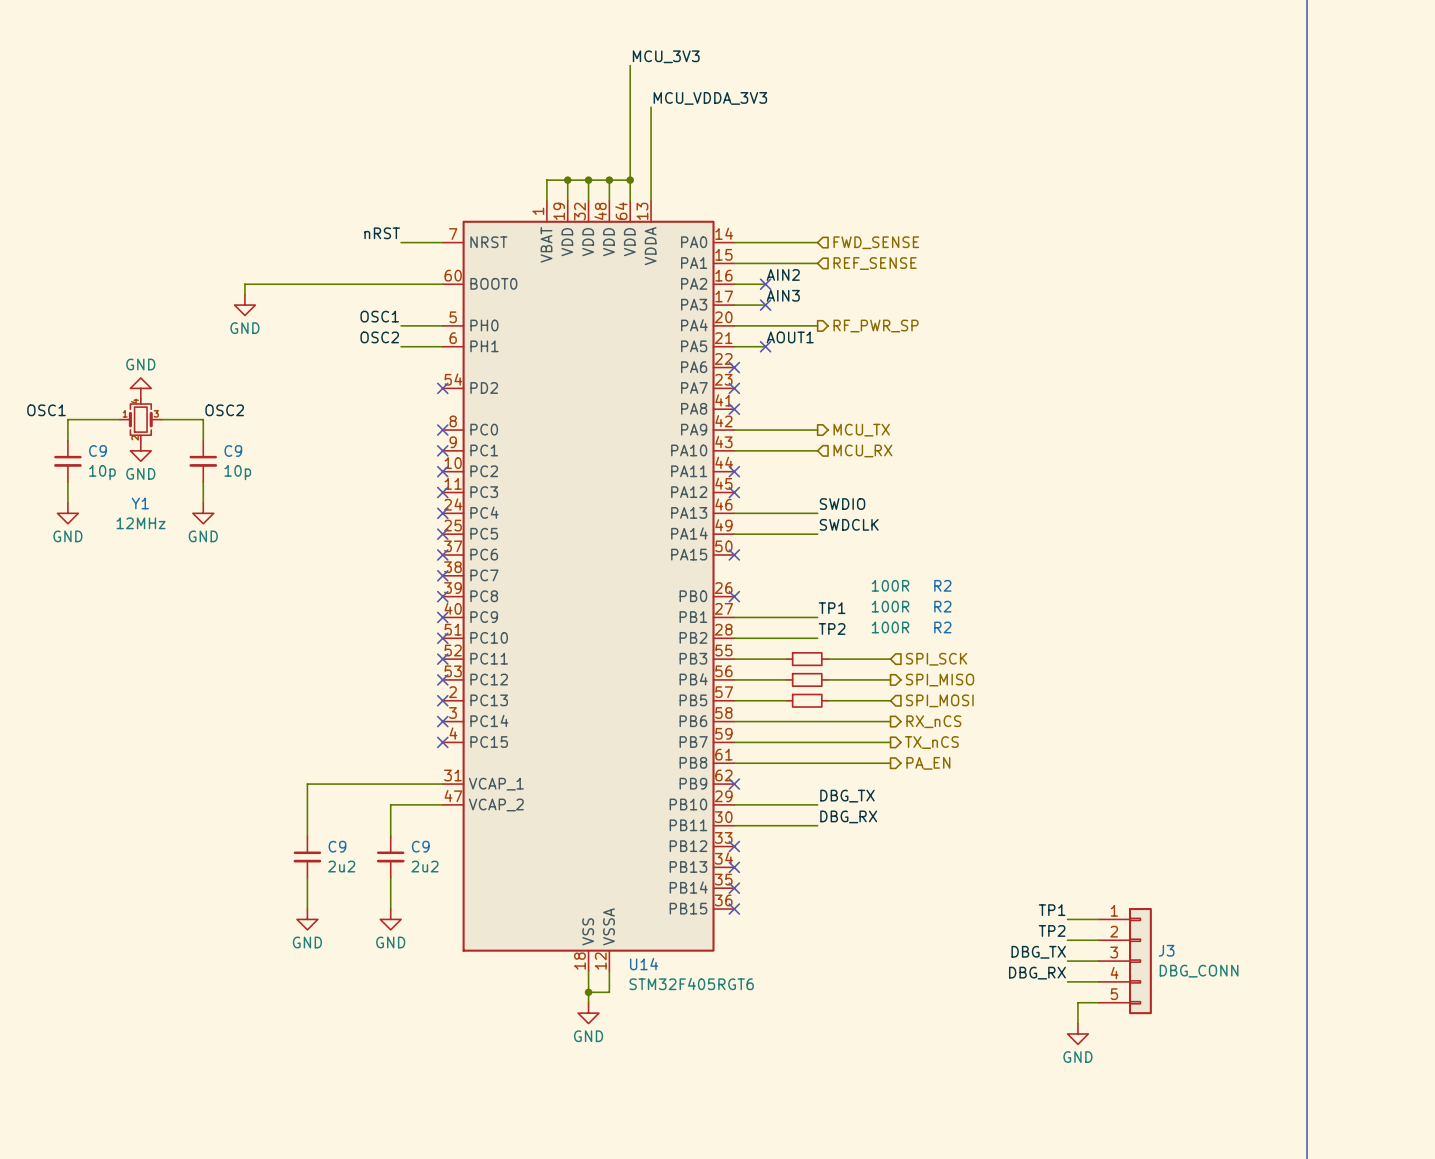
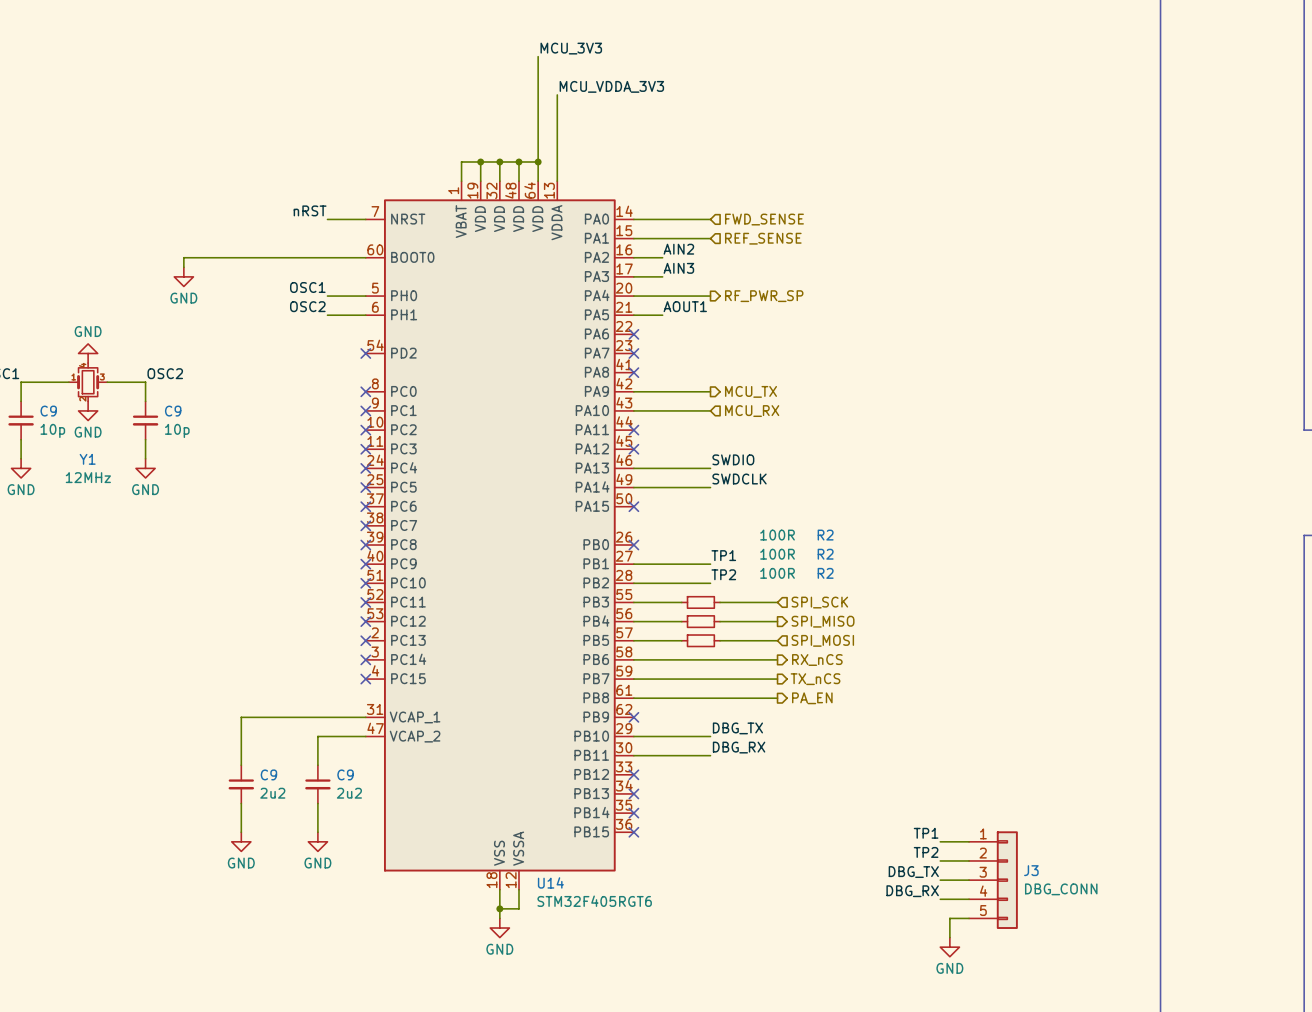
no-connect mark: (765, 284) -> none
no-connect mark: (765, 305) -> none
no-connect mark: (765, 346) -> none

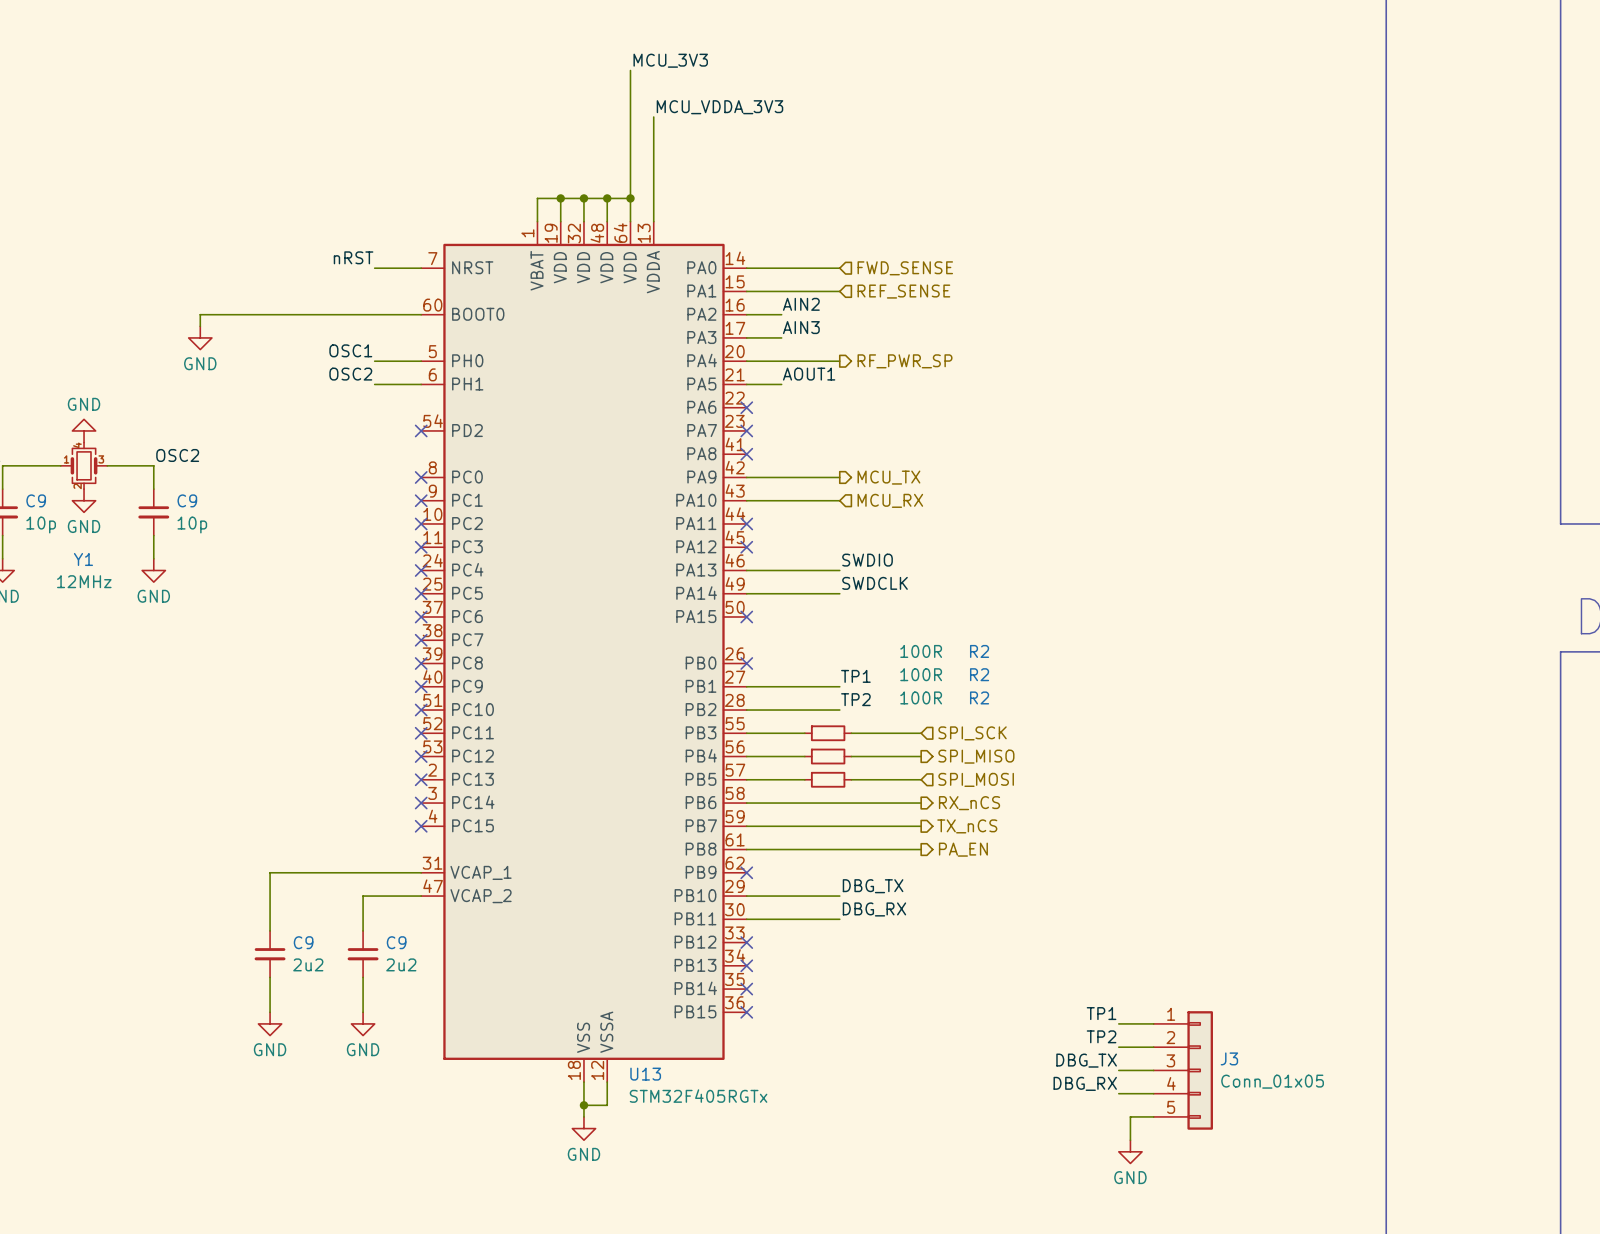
U14 name: U14 (550, 882) -> U13 (645, 1074)
J3 value: DBG_CONN (1061, 889) -> Conn_01x05 (1272, 1081)
U14 value: STM32F405RGT6 (594, 901) -> STM32F405RGTx (698, 1096)

